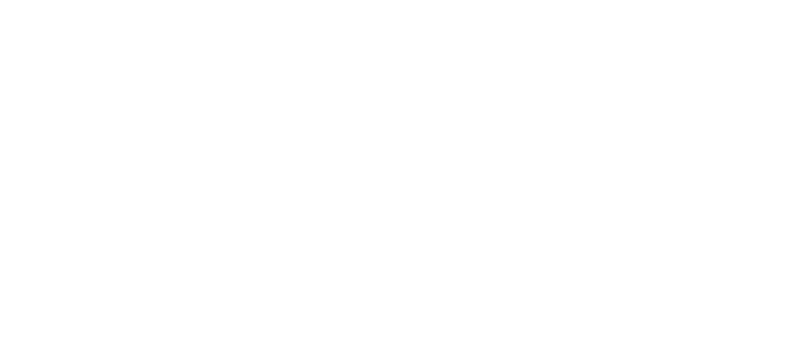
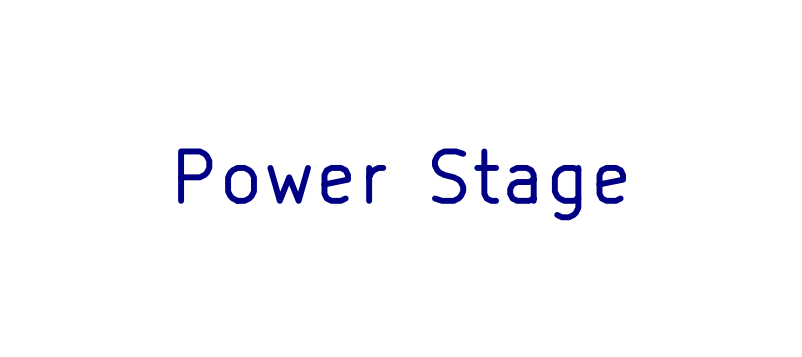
text: none -> Power Stage (402, 184)

